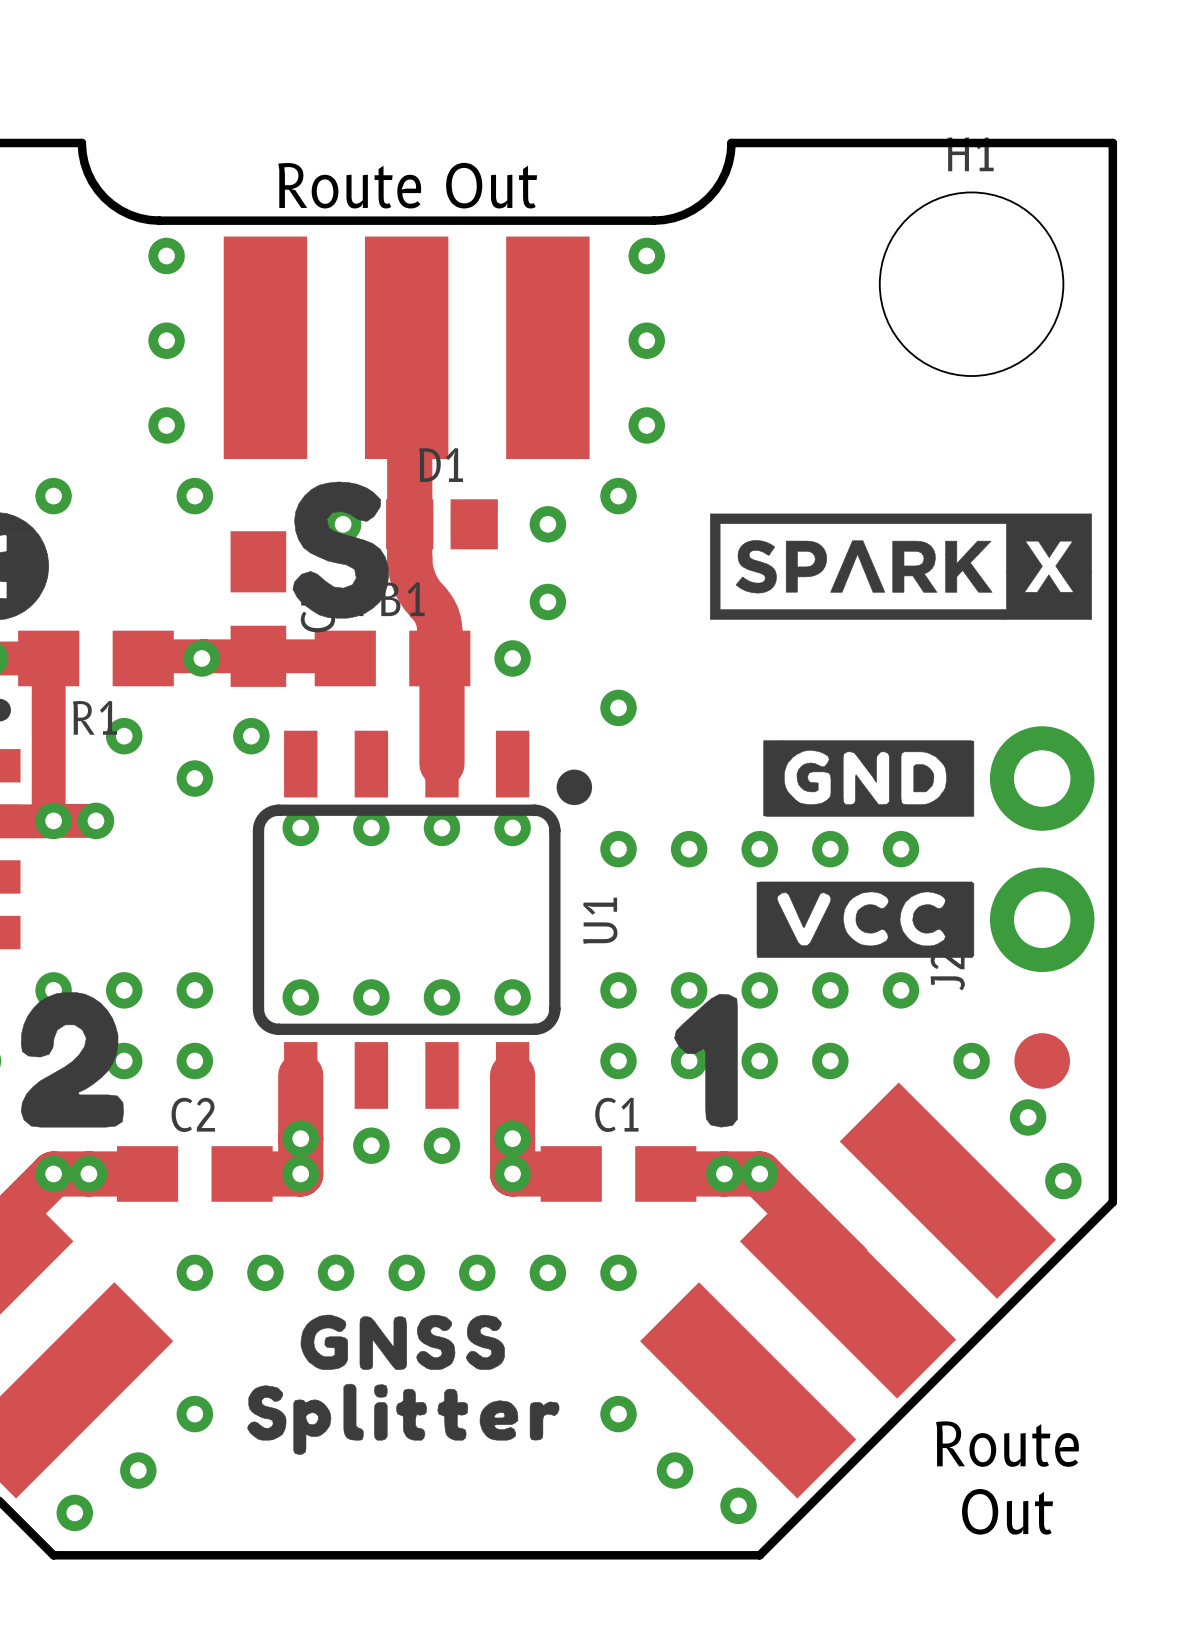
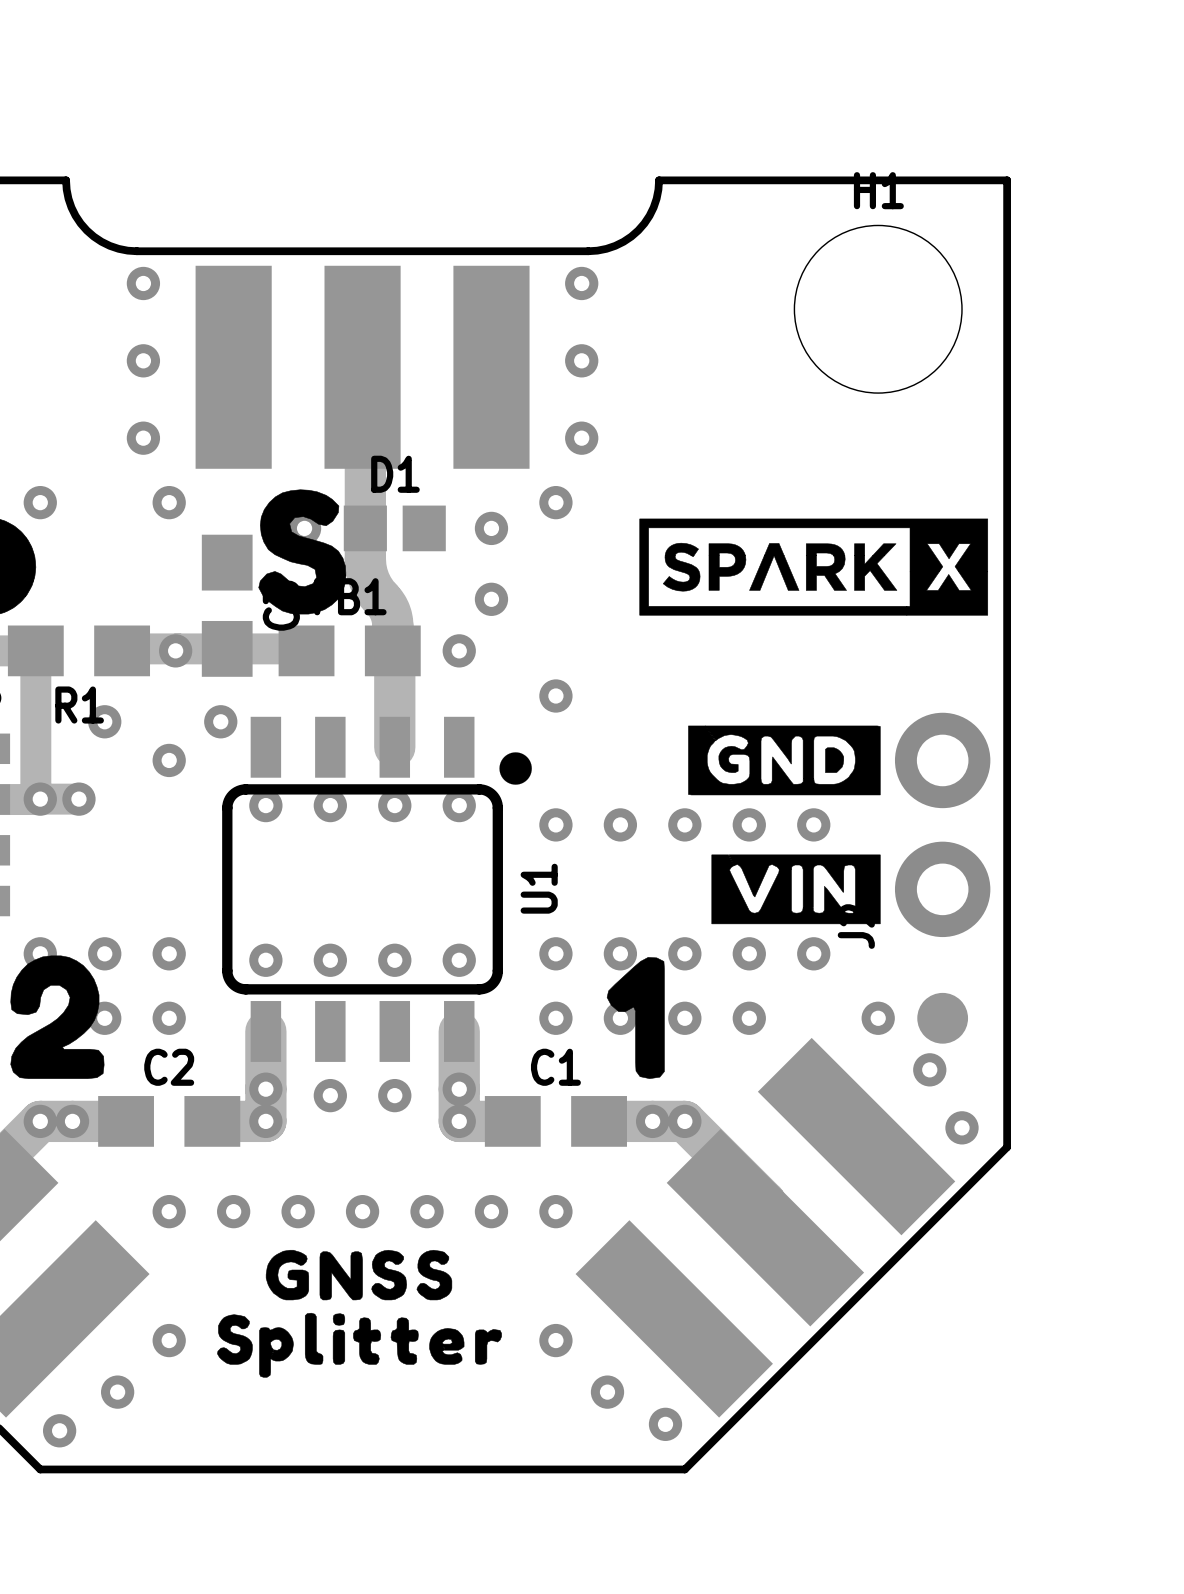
text: Route Out (407, 185) -> none
drawing shape: [756, 881, 975, 958] -> [711, 854, 881, 925]
text: Route (1007, 1444) -> none
text: Out (1007, 1511) -> none

